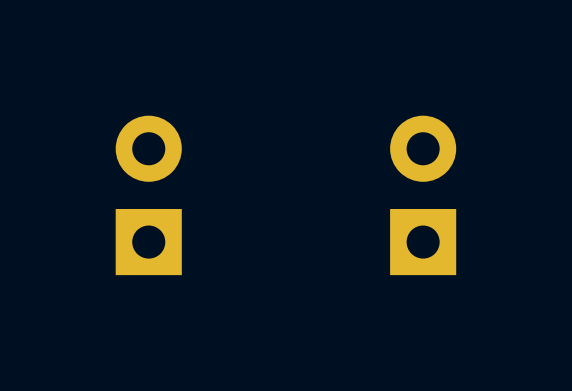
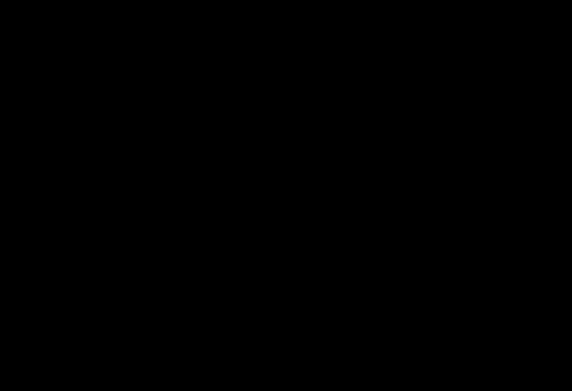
part: (148, 195) -> none
part: (423, 195) -> none

